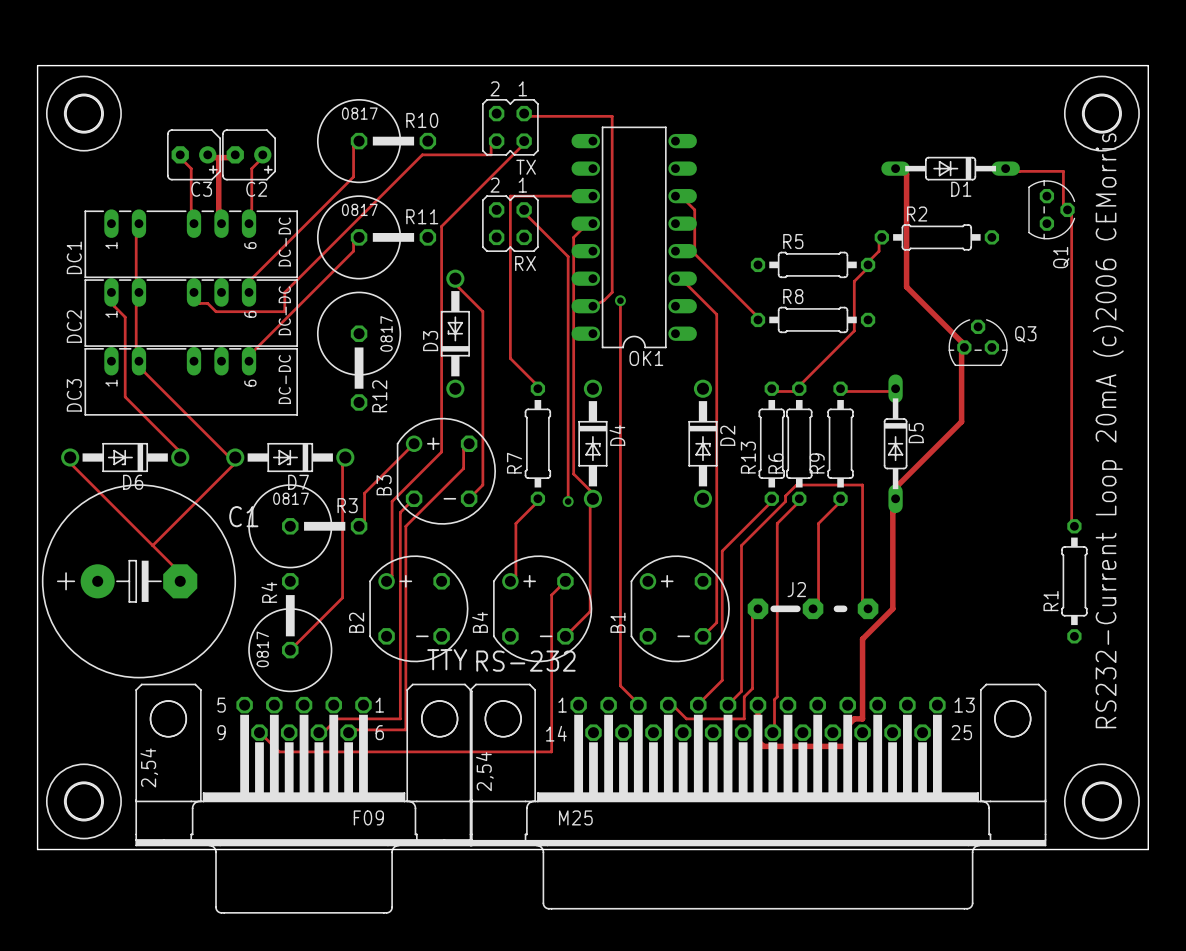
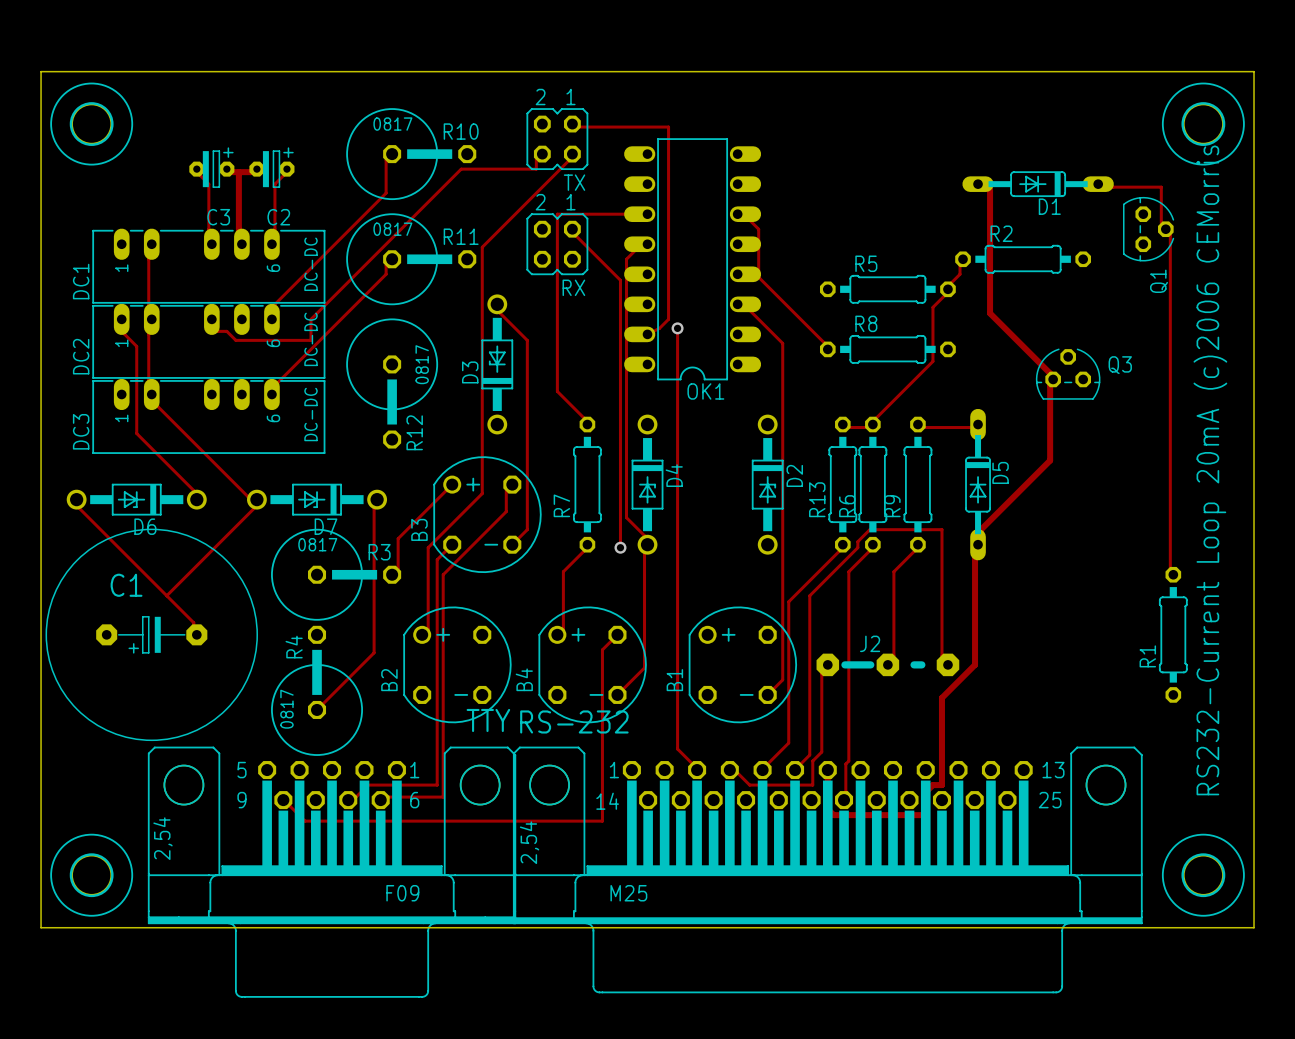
C3 footprint: [167, 129, 221, 181] -> [189, 147, 235, 188]
C2 footprint: [222, 129, 276, 181] -> [249, 147, 295, 188]
C1 footprint: [41, 484, 237, 679] -> [45, 528, 258, 742]
C1 name position: C1 (243, 516) -> C1 (126, 585)

